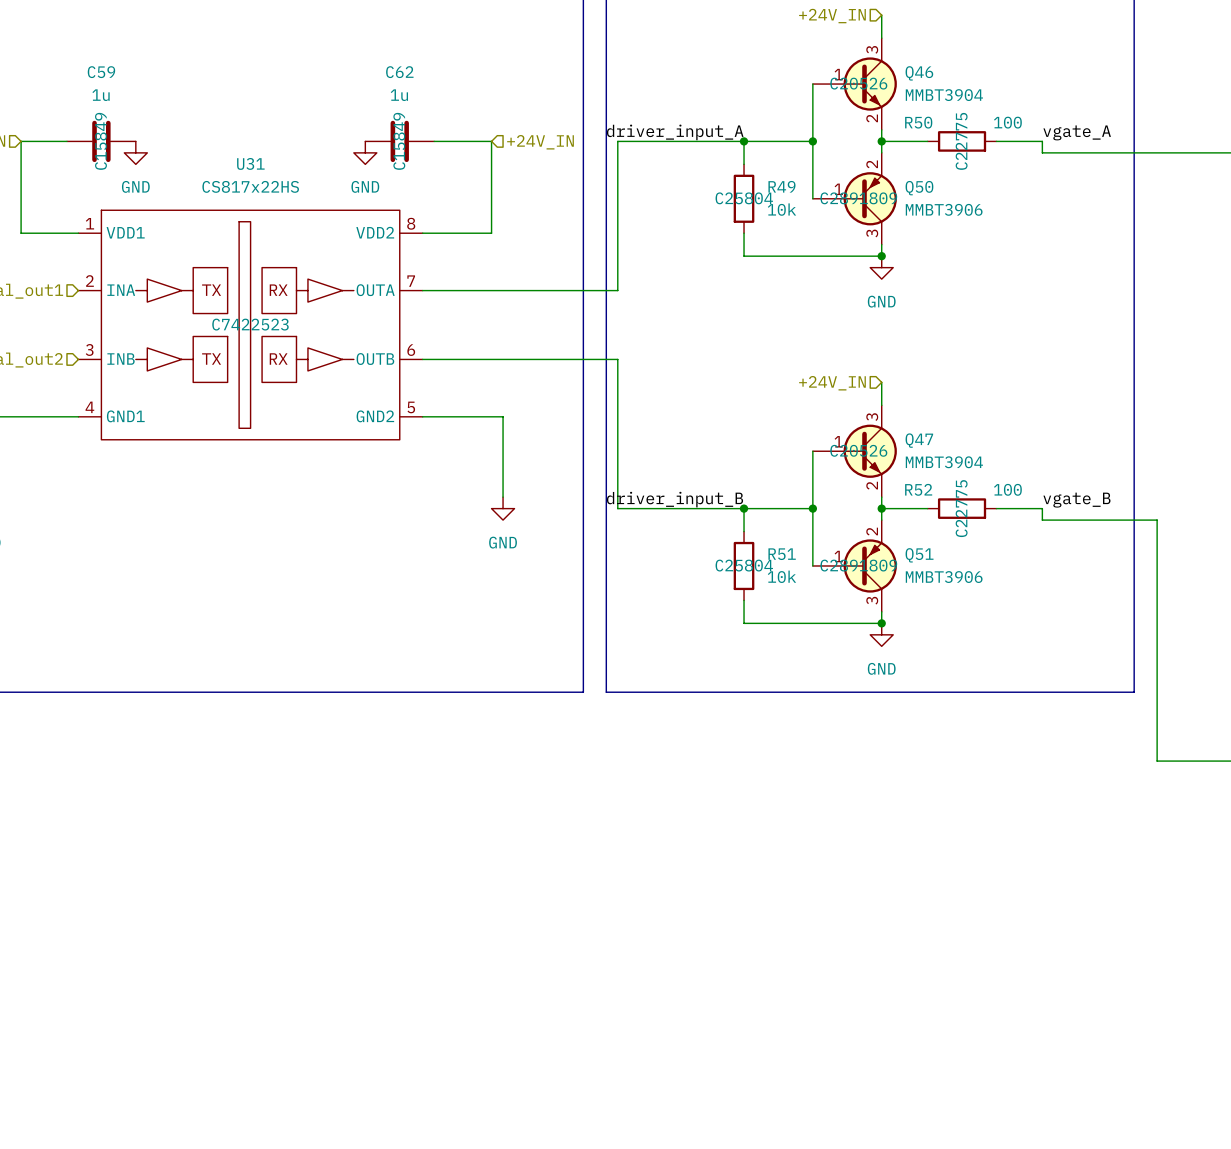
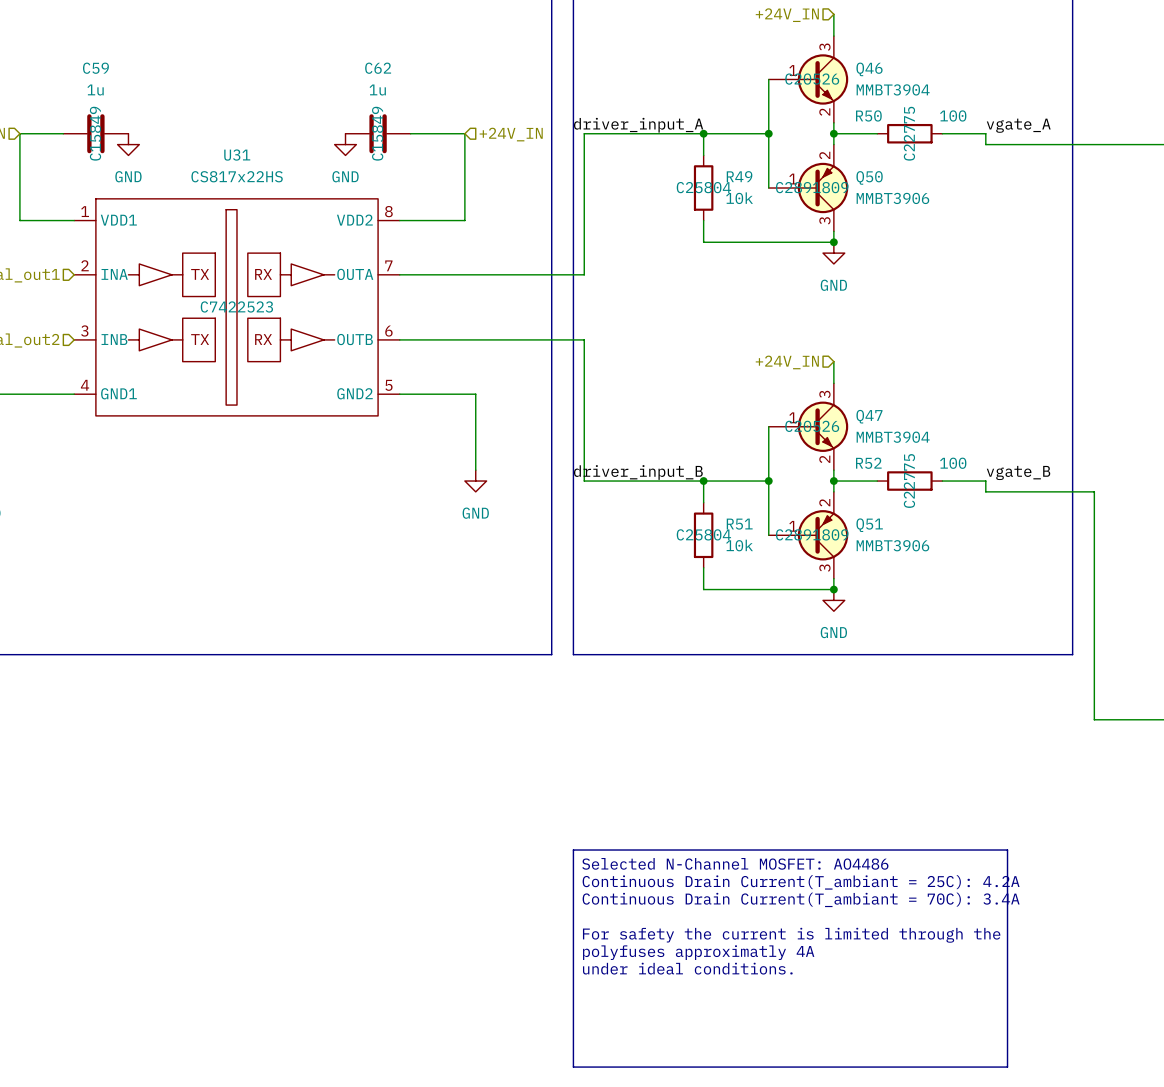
line: none -> (573, 850) (1007, 850) (1007, 1067) (573, 1067) (573, 850)
text: none -> Selected N-Channel MOSFET: AO4486 (735, 863)
text: none -> Continuous Drain Current(T_ambiant = 25C): 4.2A (801, 882)
text: none -> Continuous Drain Current(T_ambiant = 70C): 3.4A (801, 899)
text: none -> For safety the current is limited through the (791, 935)
text: none -> polyfuses approximatly 4A (698, 952)
text: none -> under ideal conditions. (687, 968)

